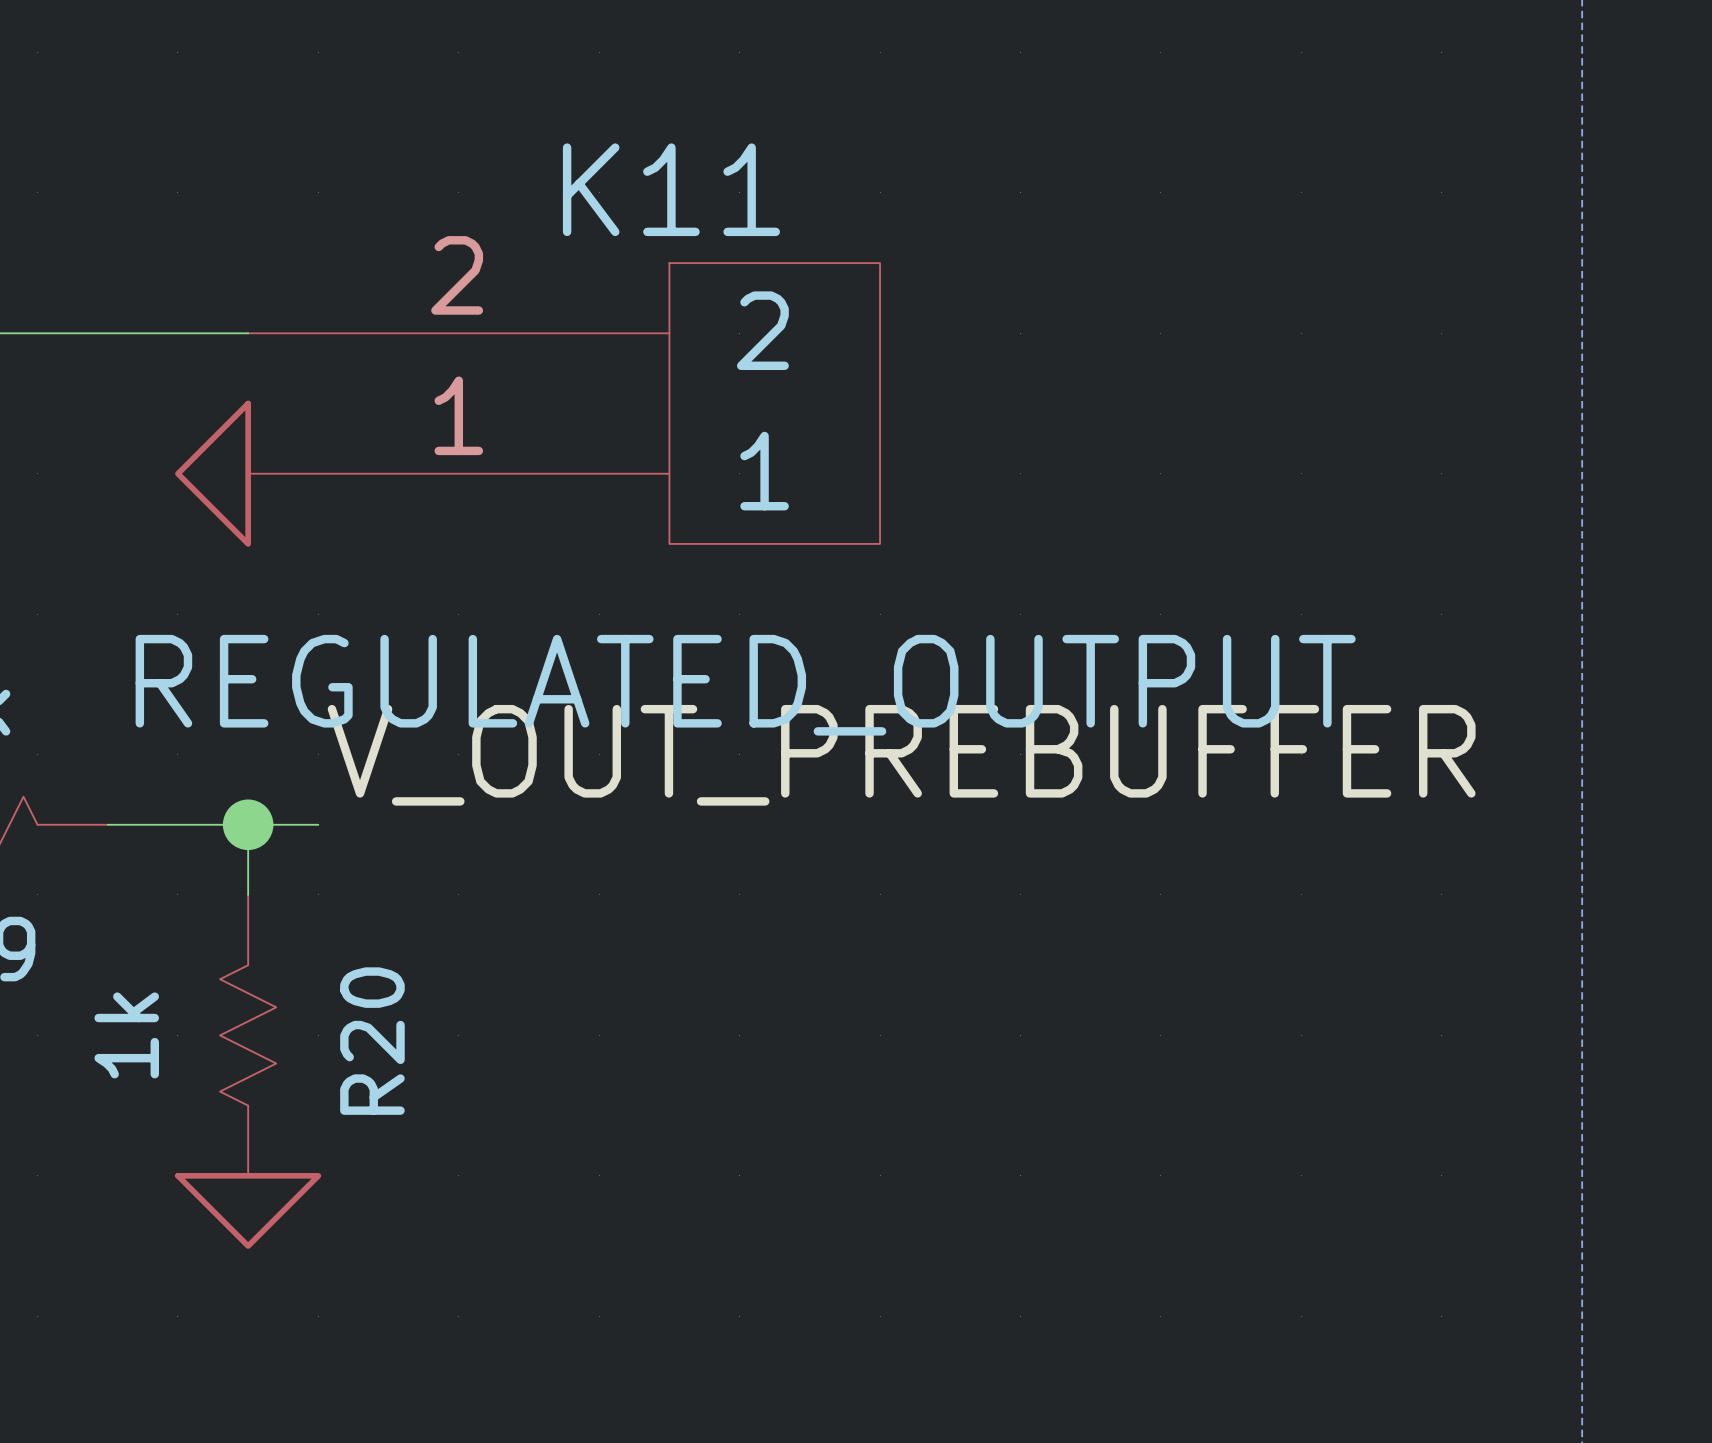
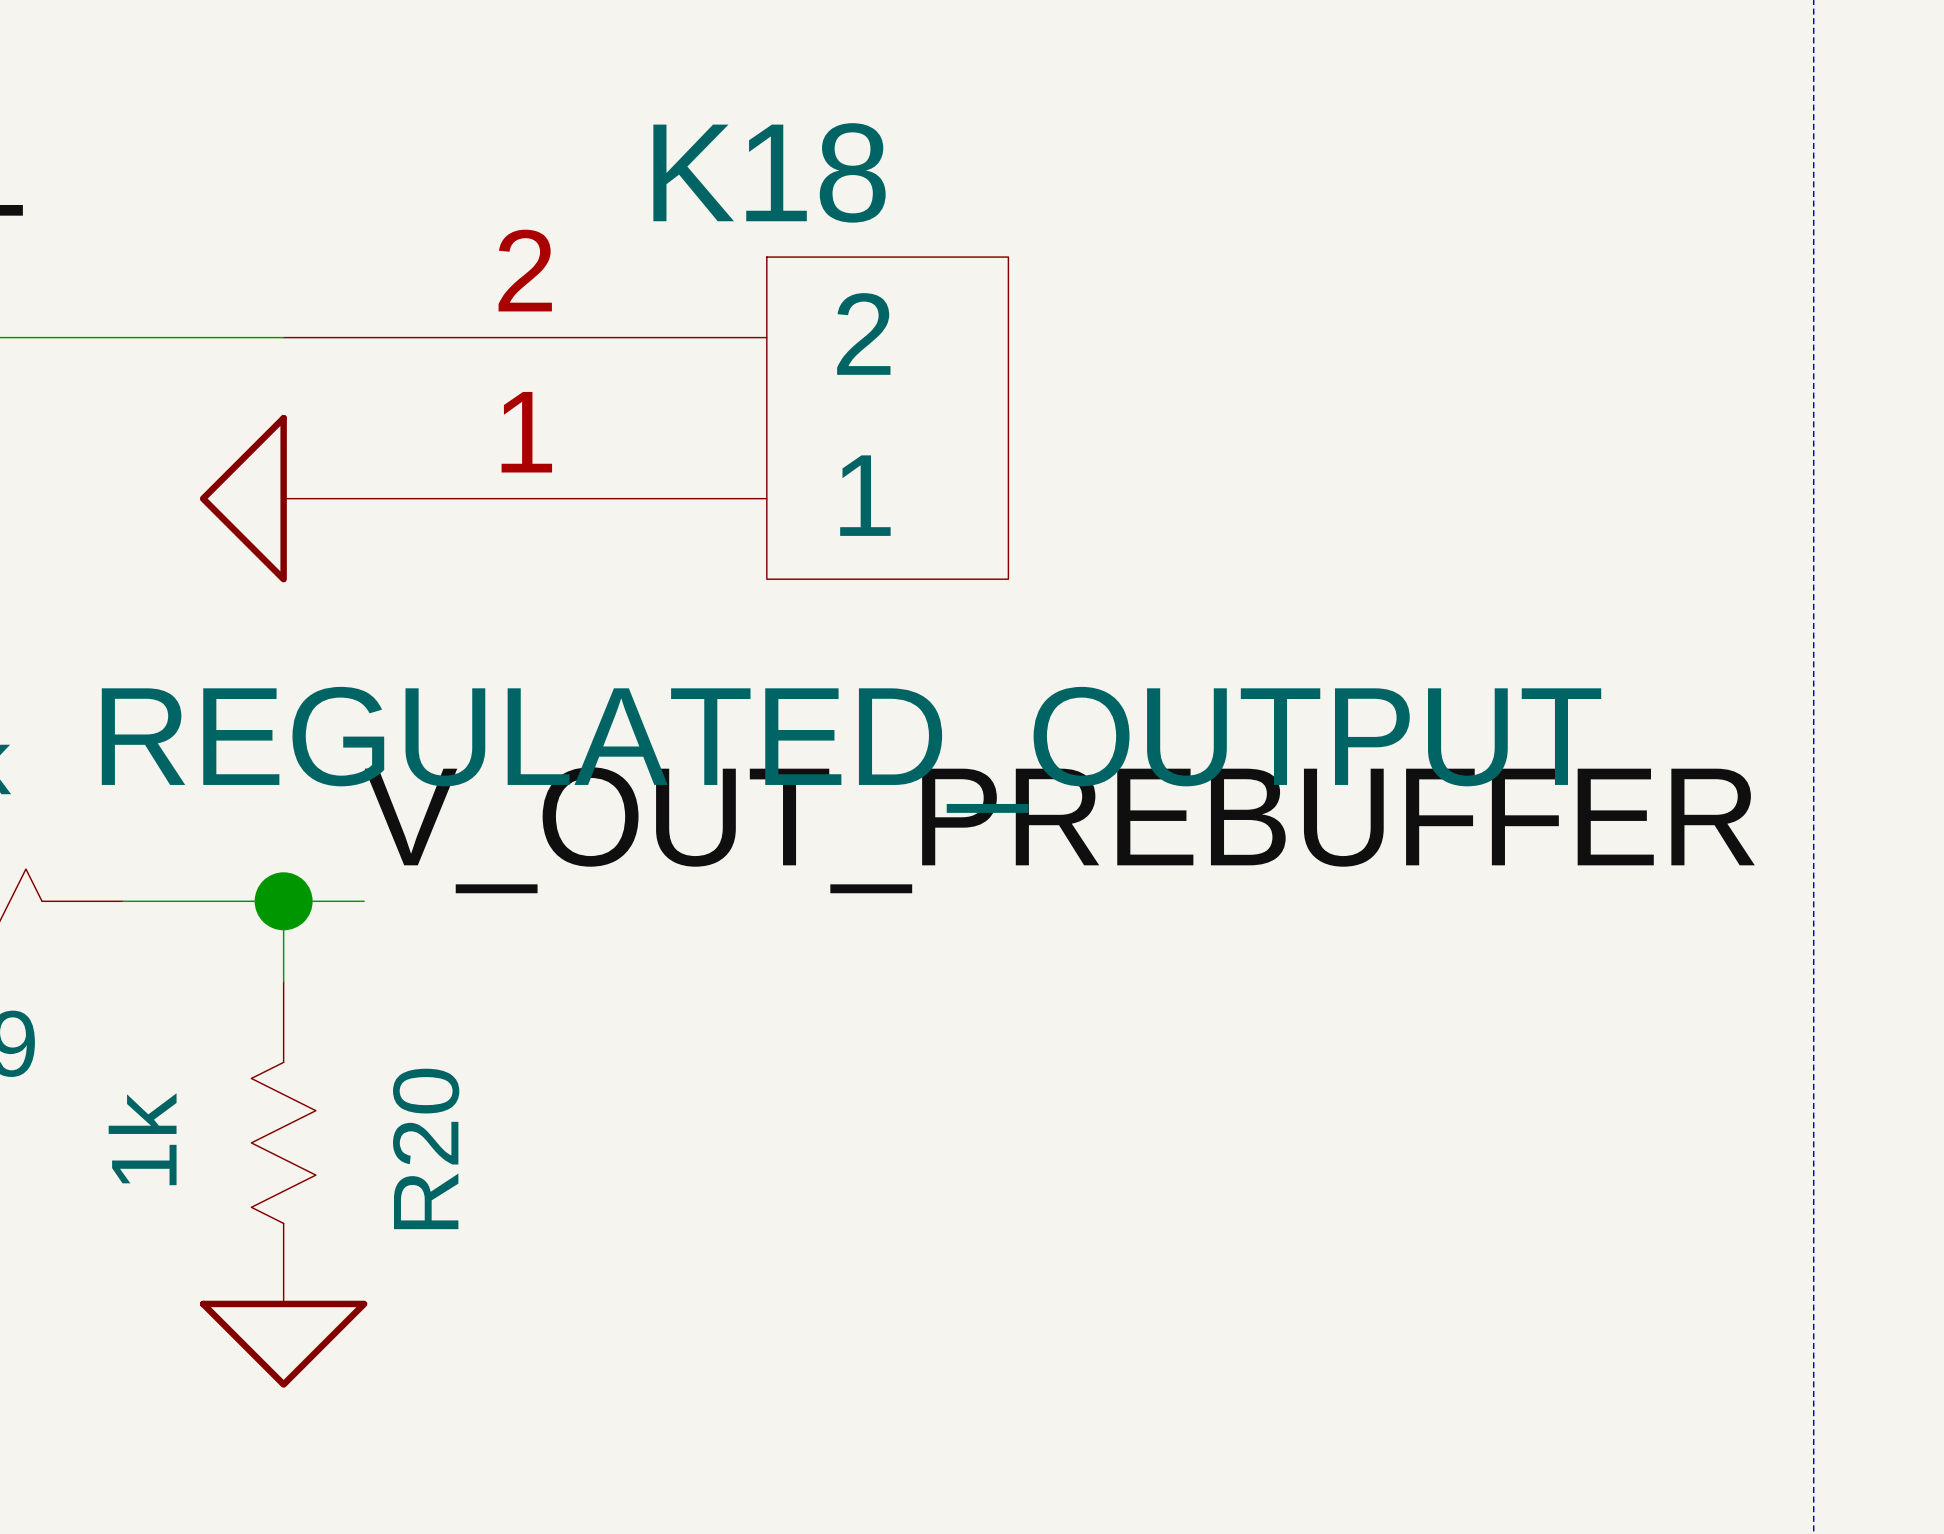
K11 name: K11 (671, 189) -> K18 (769, 172)

